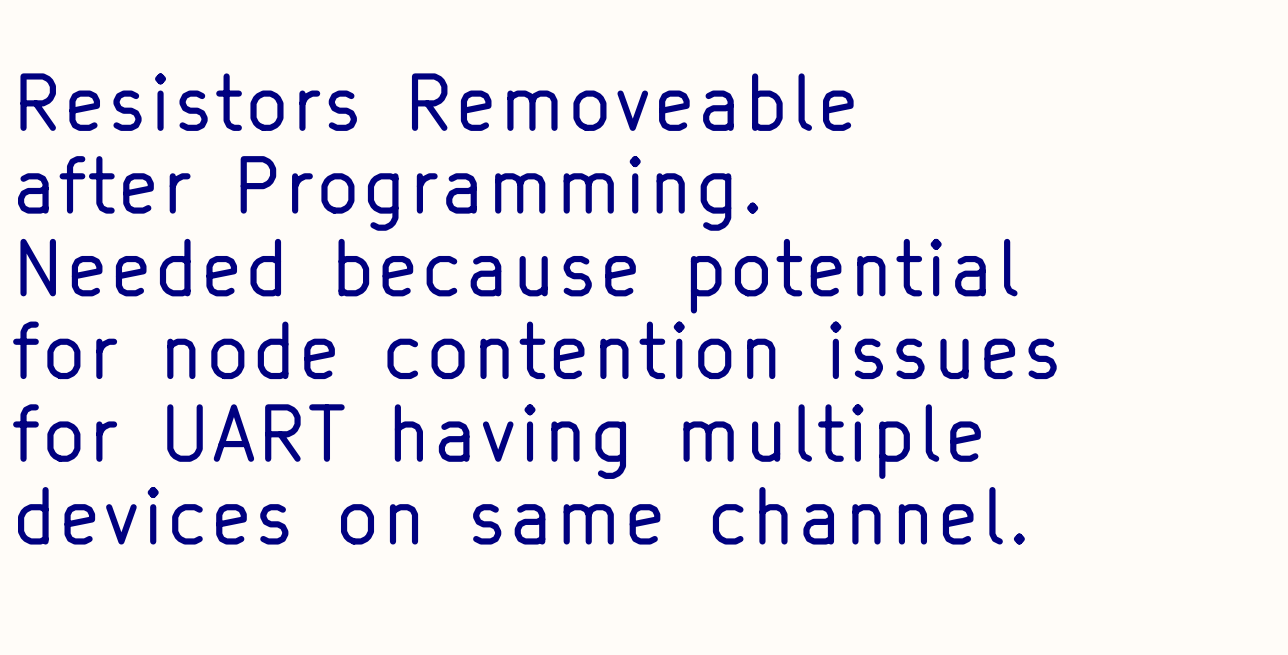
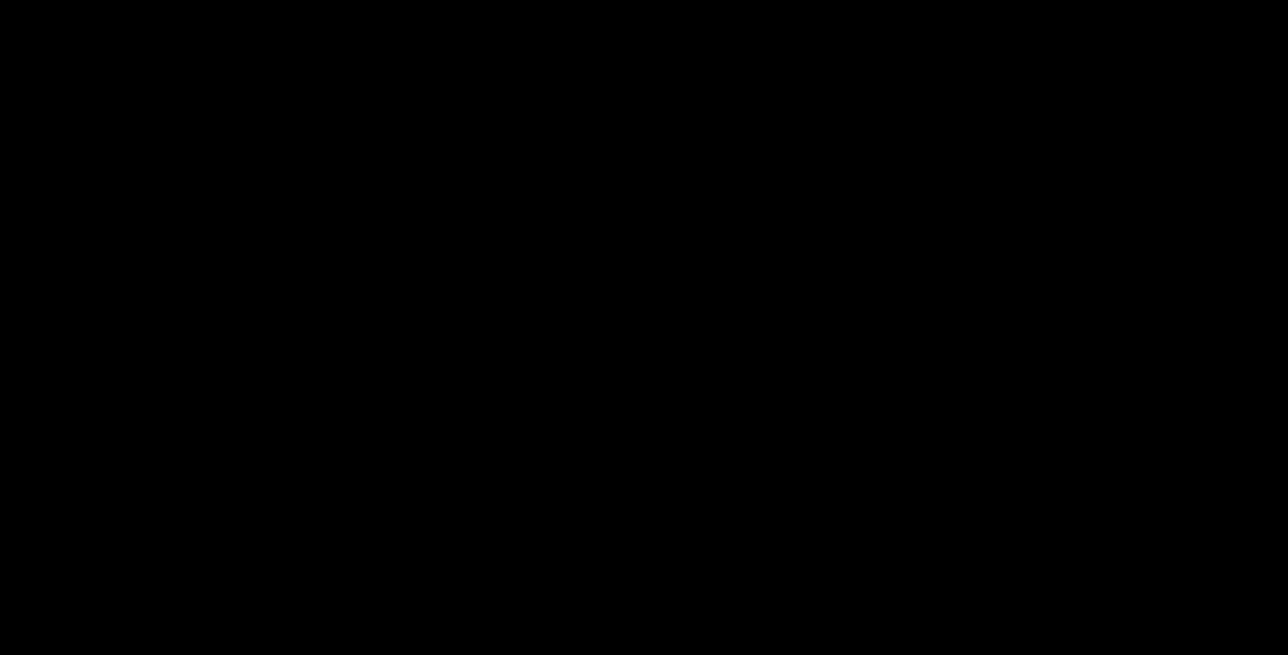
text: Resistors Removeable (437, 102) -> none
text: after Programming. (388, 193) -> none
text: Needed because potential (519, 276) -> none
text: for node contention issues (534, 350) -> none
text: for UART having multiple (496, 441) -> none
text: devices on same channel. (521, 515) -> none

